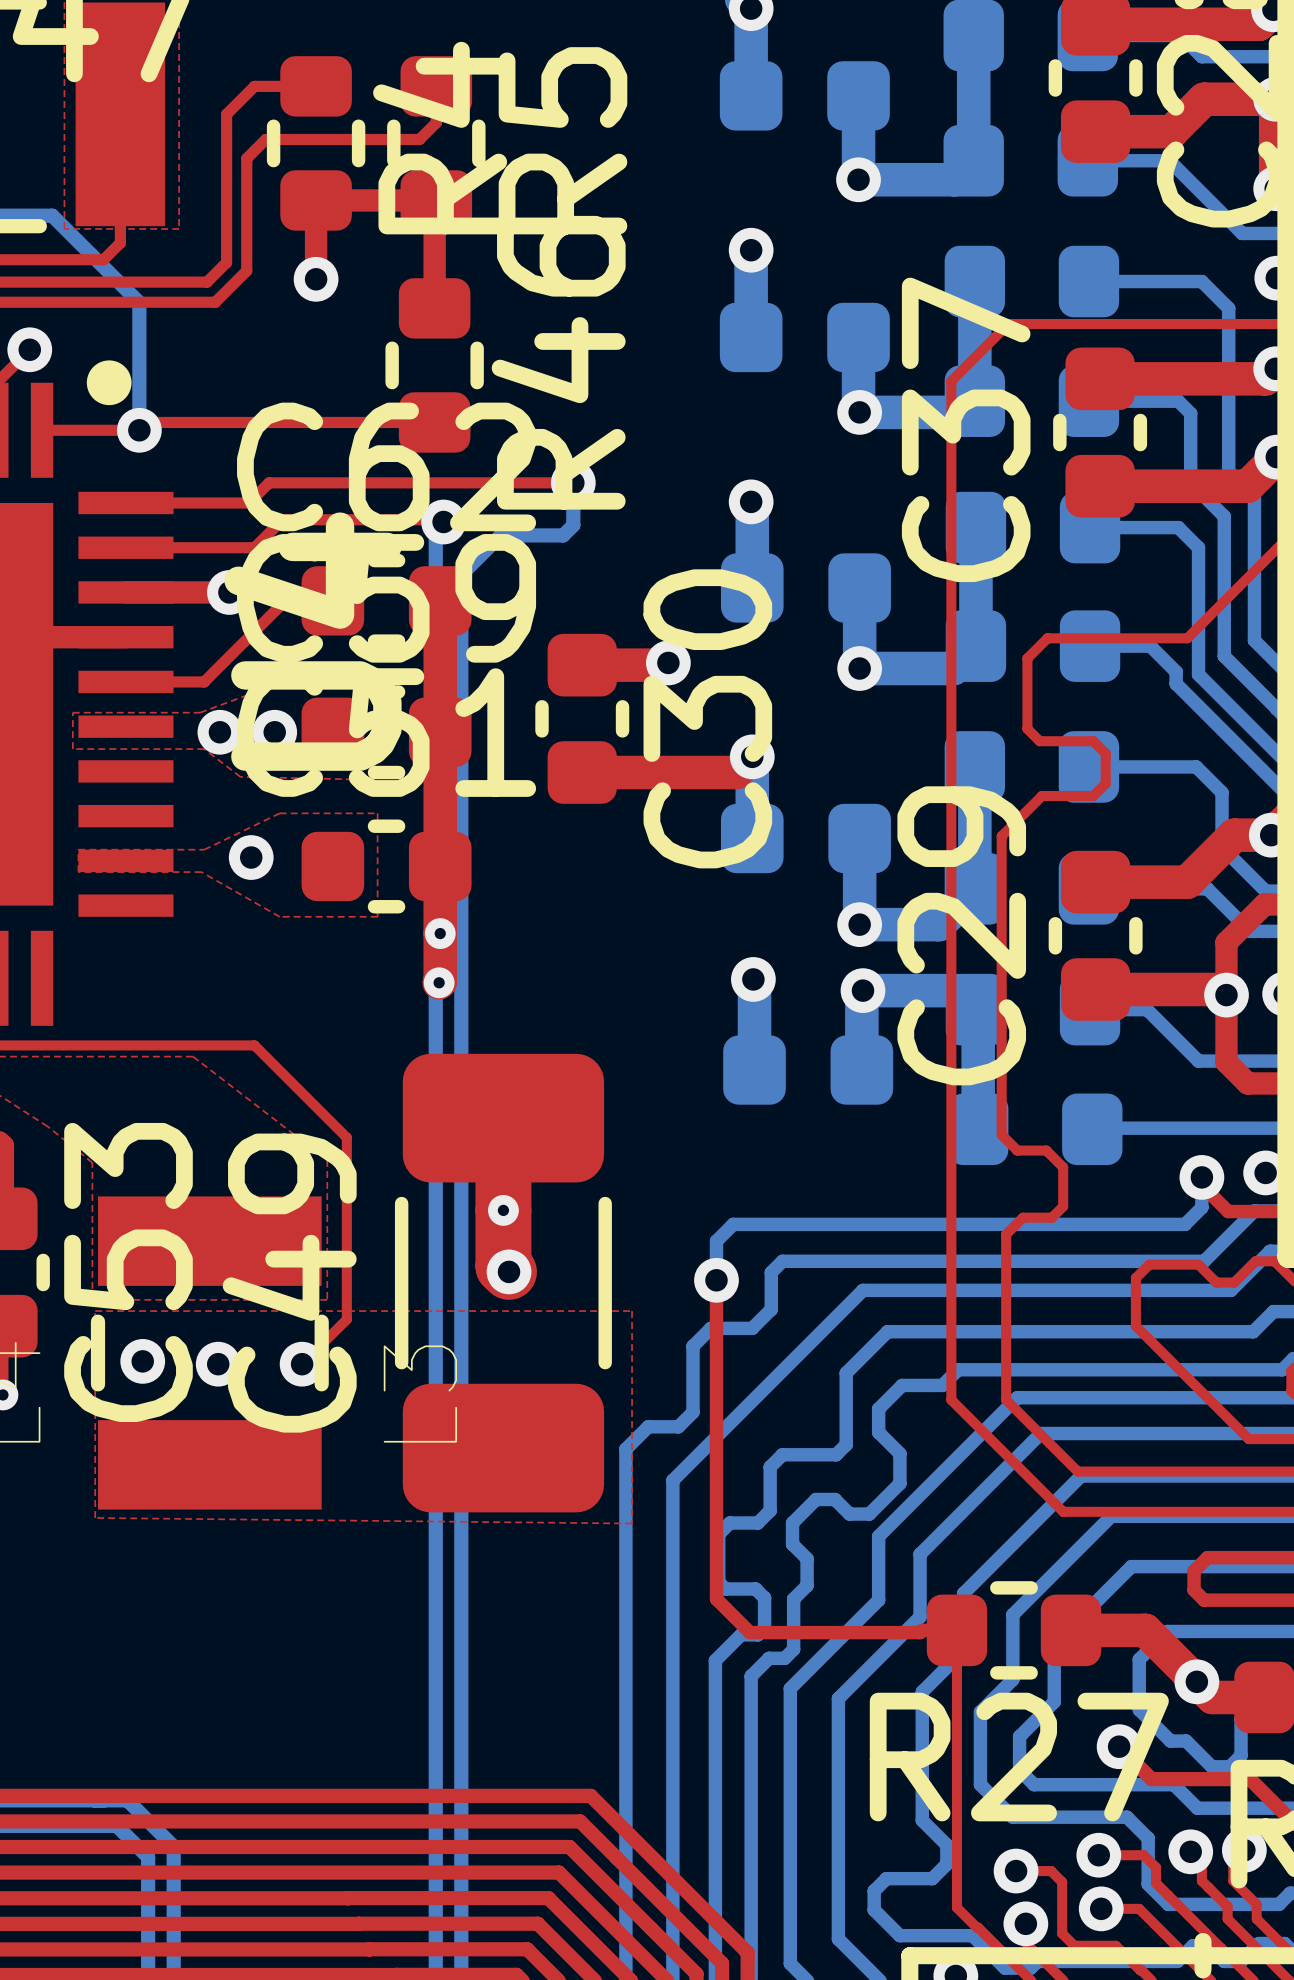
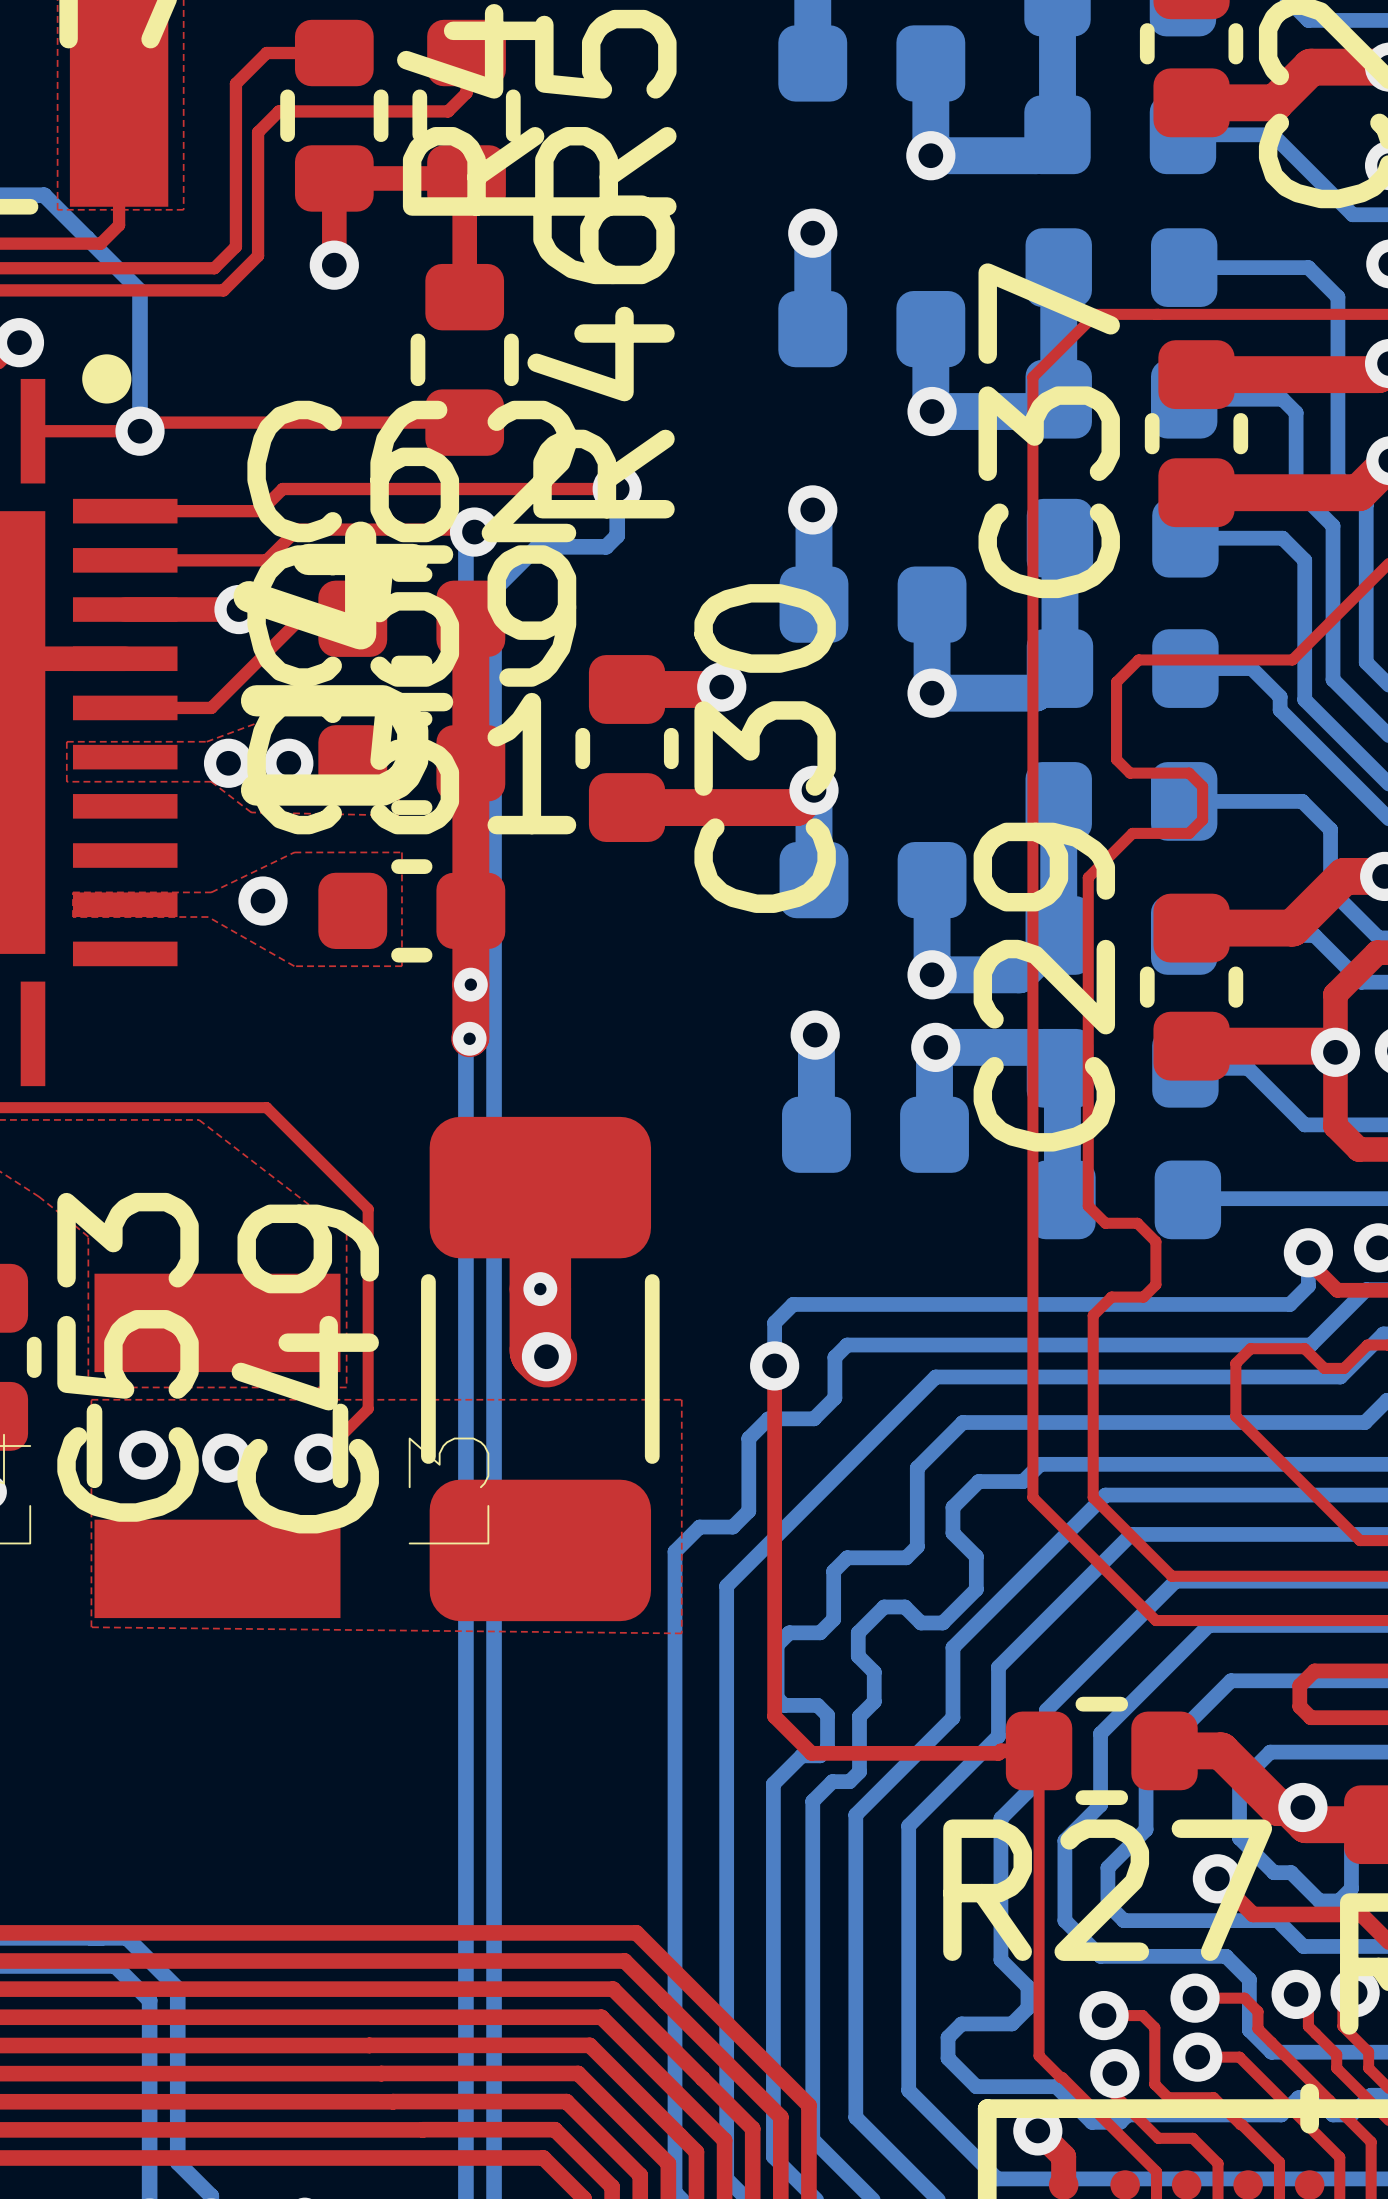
top track: (1122, 1630) (1145, 1630) (1212, 1697) -> (1221, 1750) (1277, 1807) (1288, 1807) (1305, 1824) (1320, 1824)

